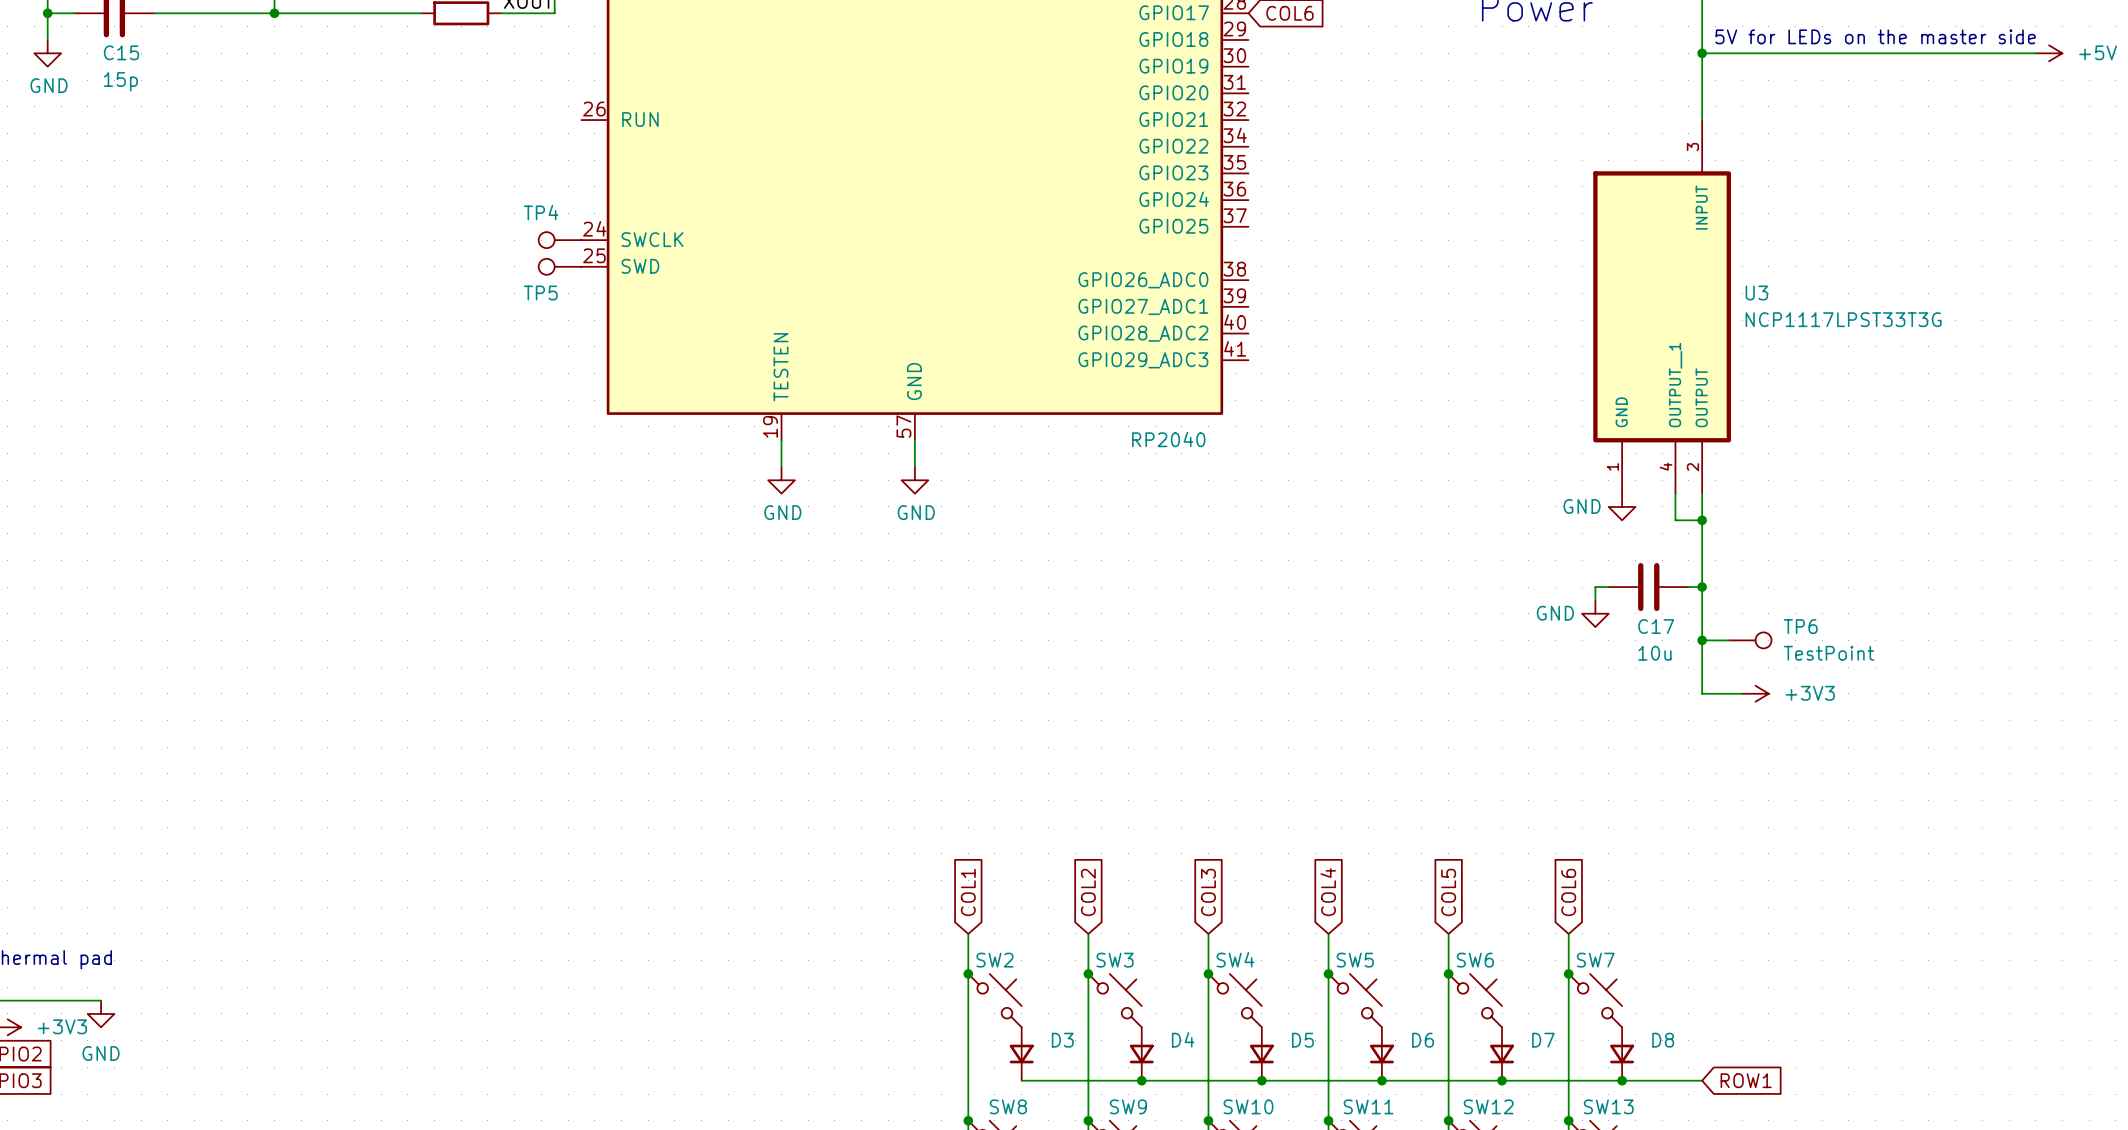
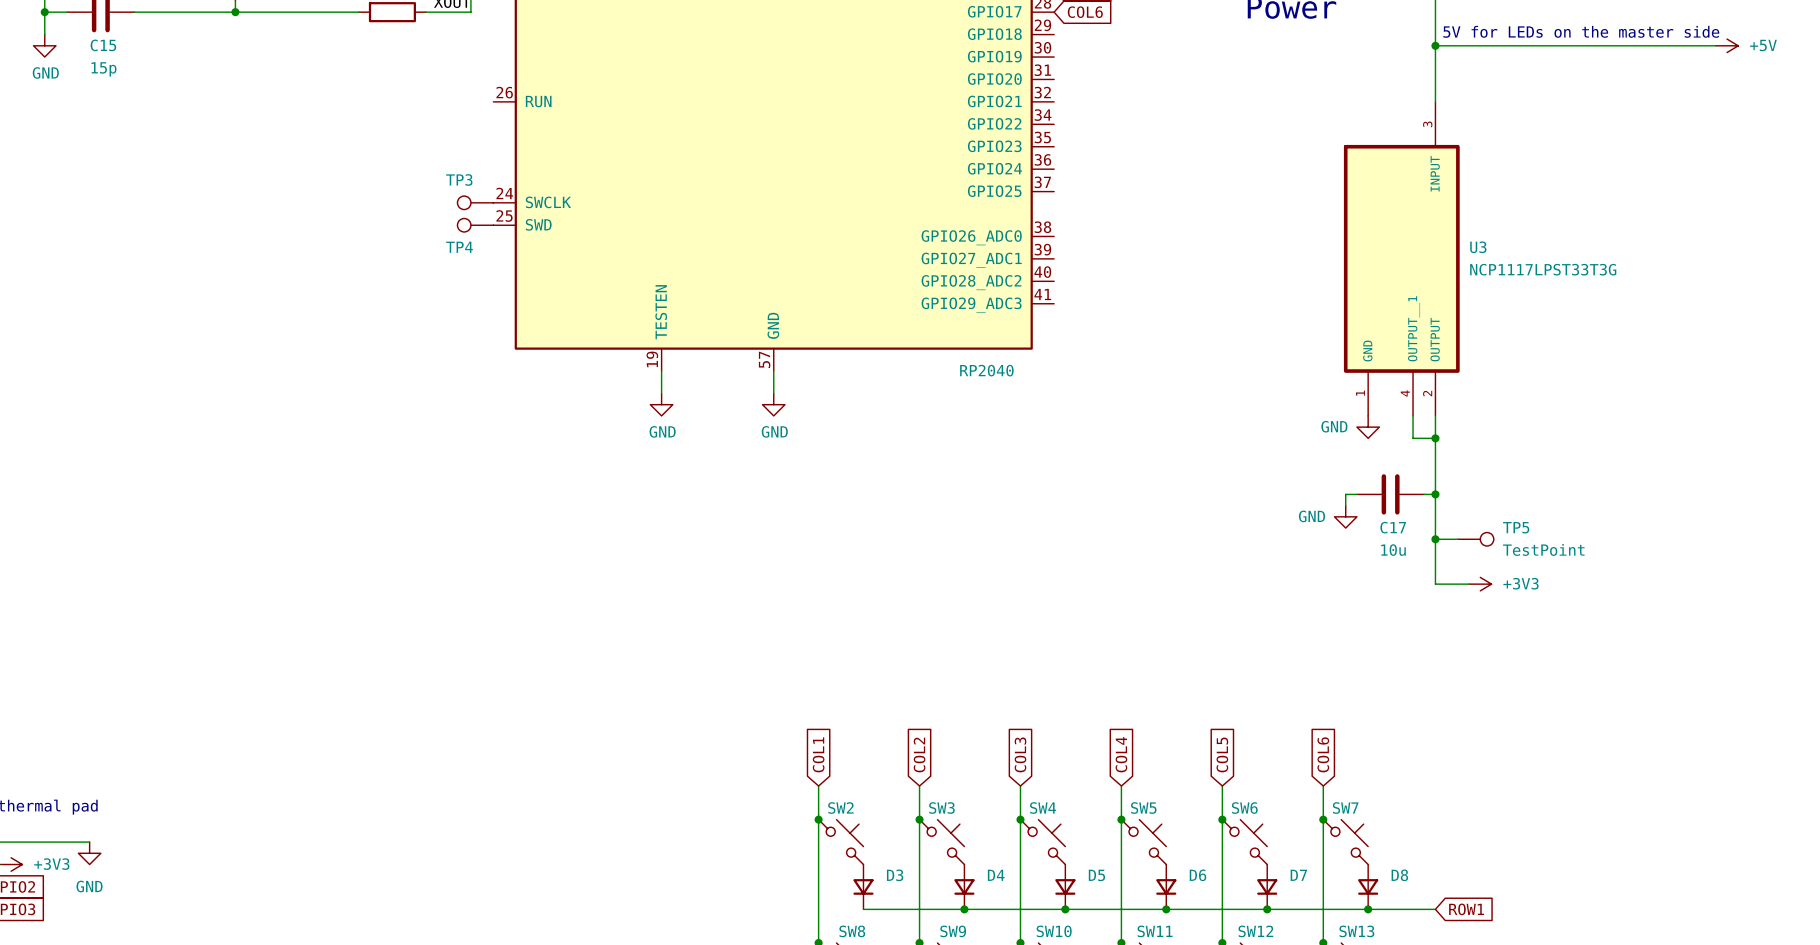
TP4 name: TP4 (541, 212) -> TP3 (459, 179)
TP5 name: TP5 (540, 292) -> TP4 (459, 247)
TP6 name: TP6 (1800, 626) -> TP5 (1516, 527)

